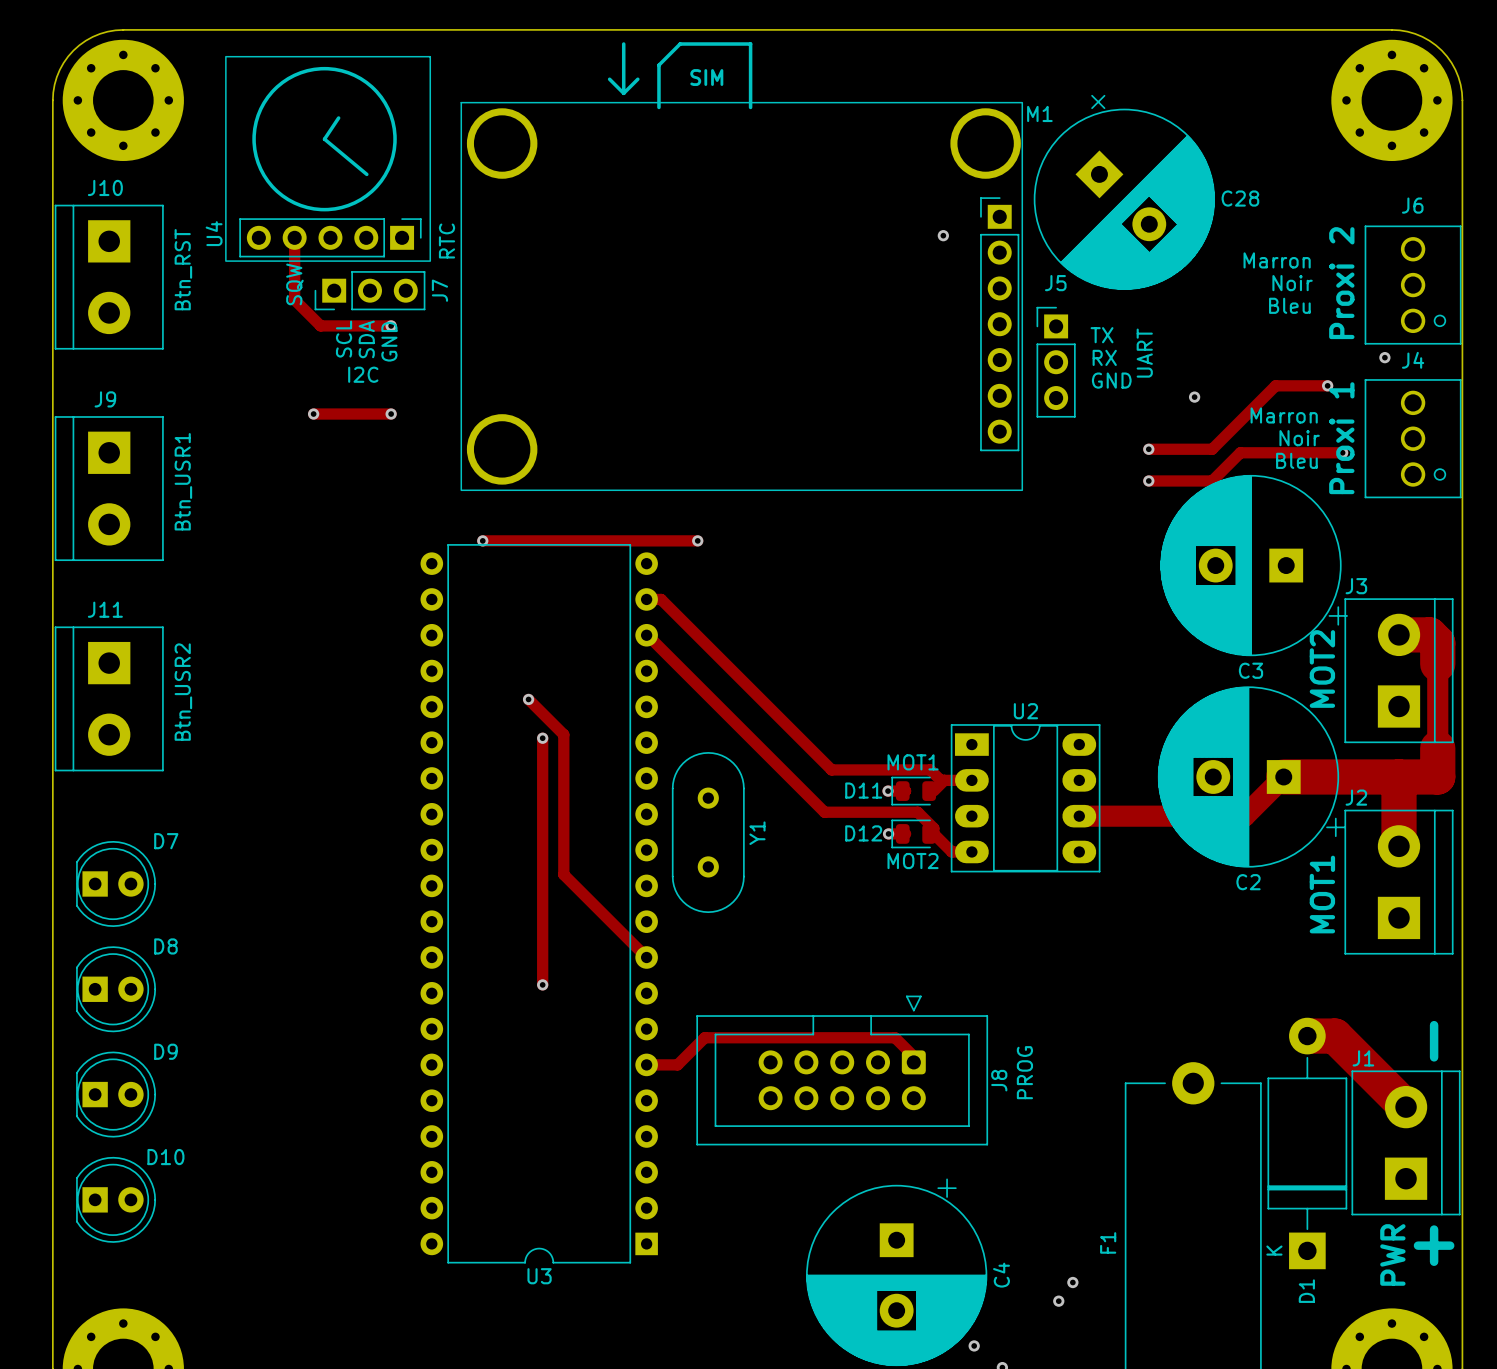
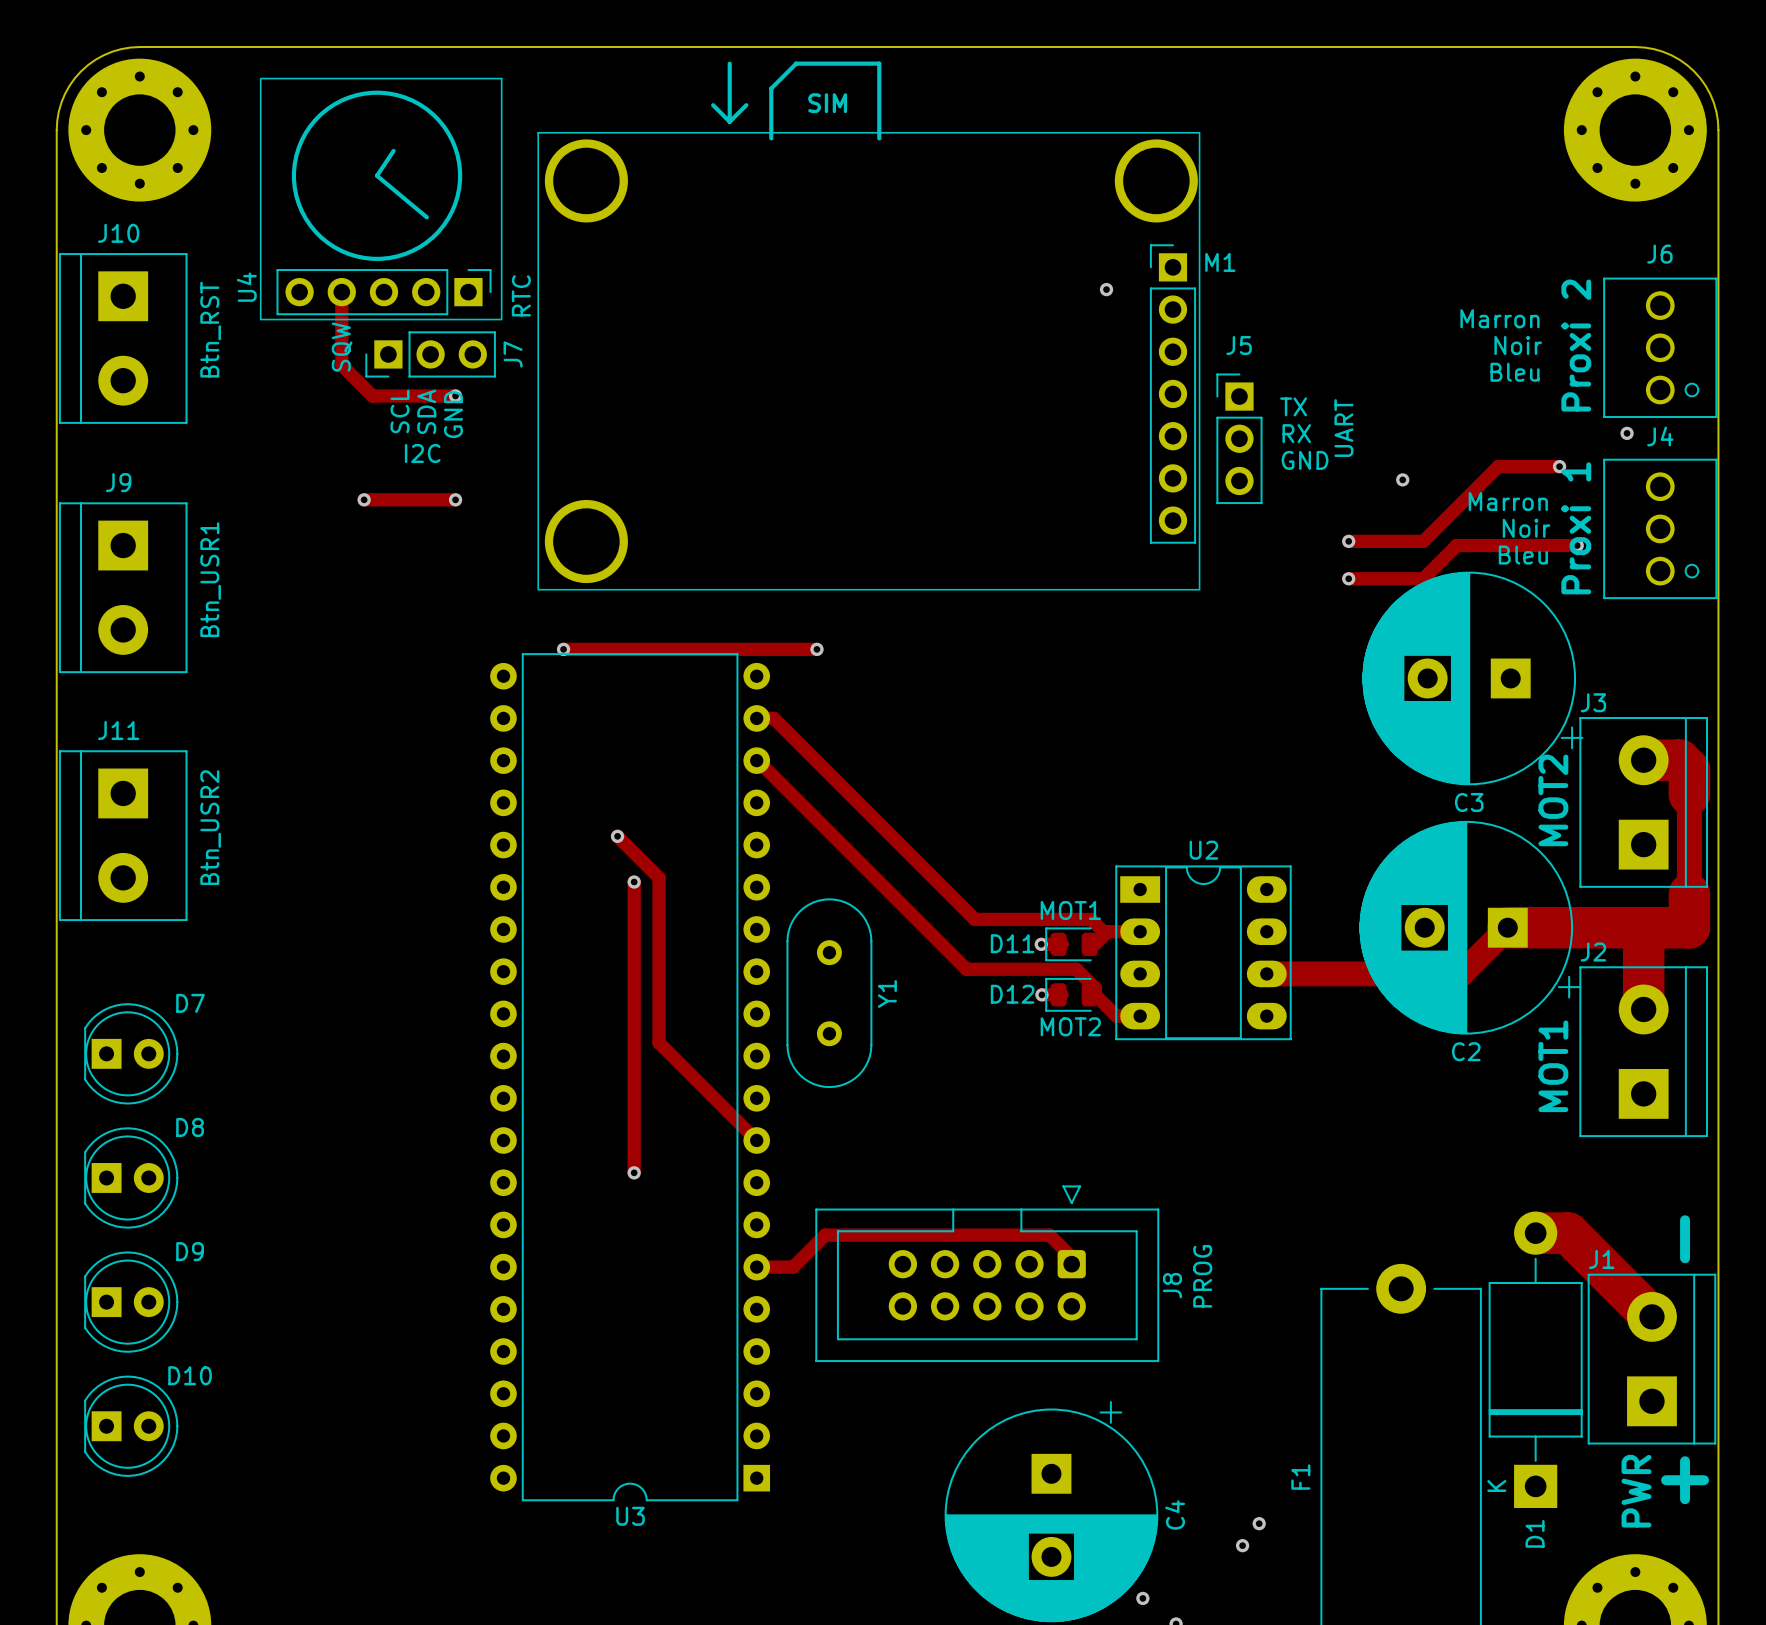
M1 name position: M1 (1039, 113) -> M1 (1220, 262)
C28: (1124, 192) -> none

